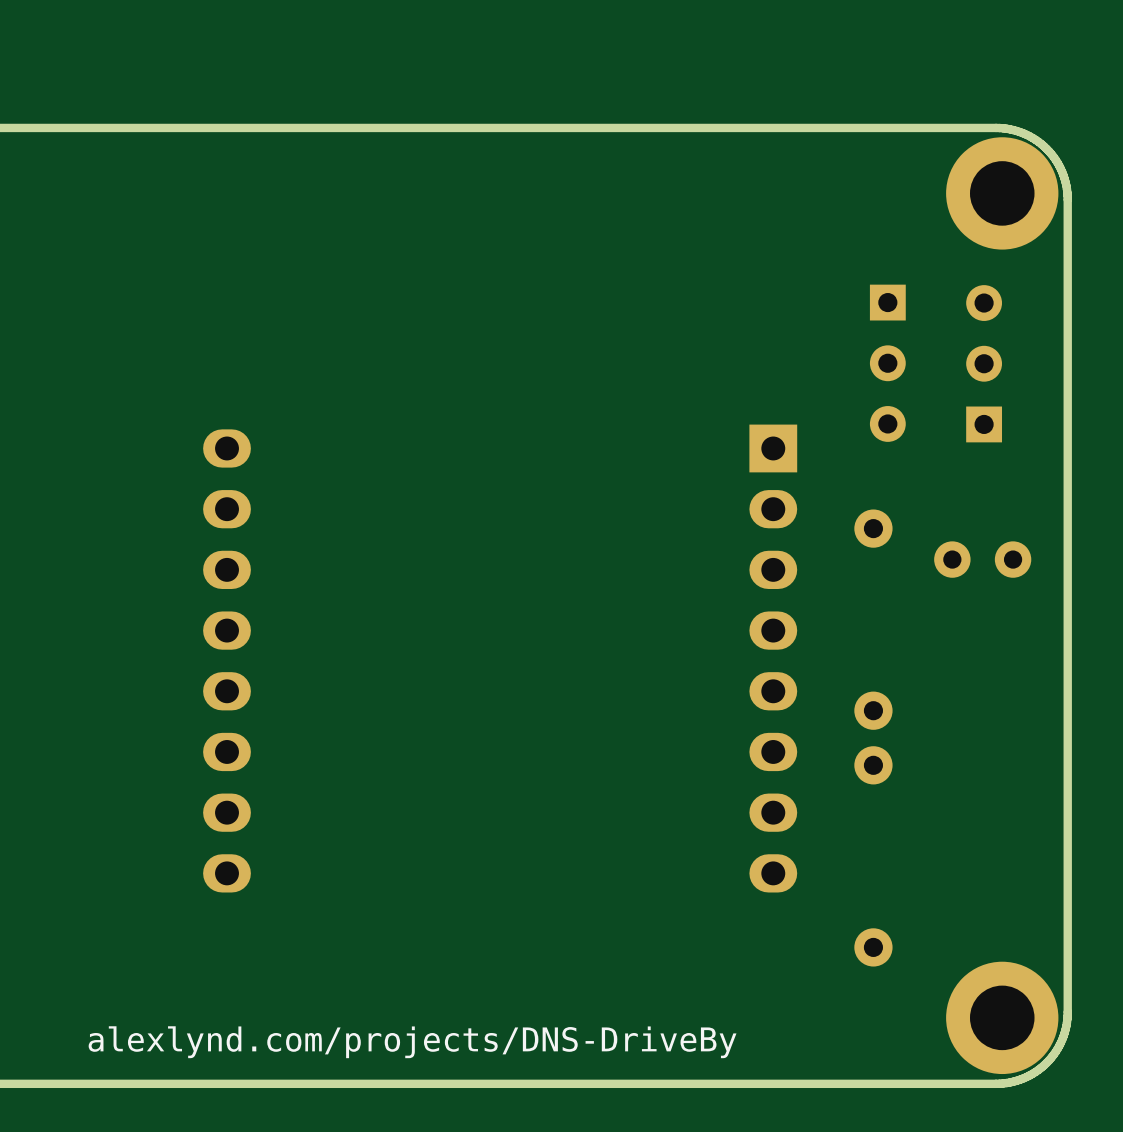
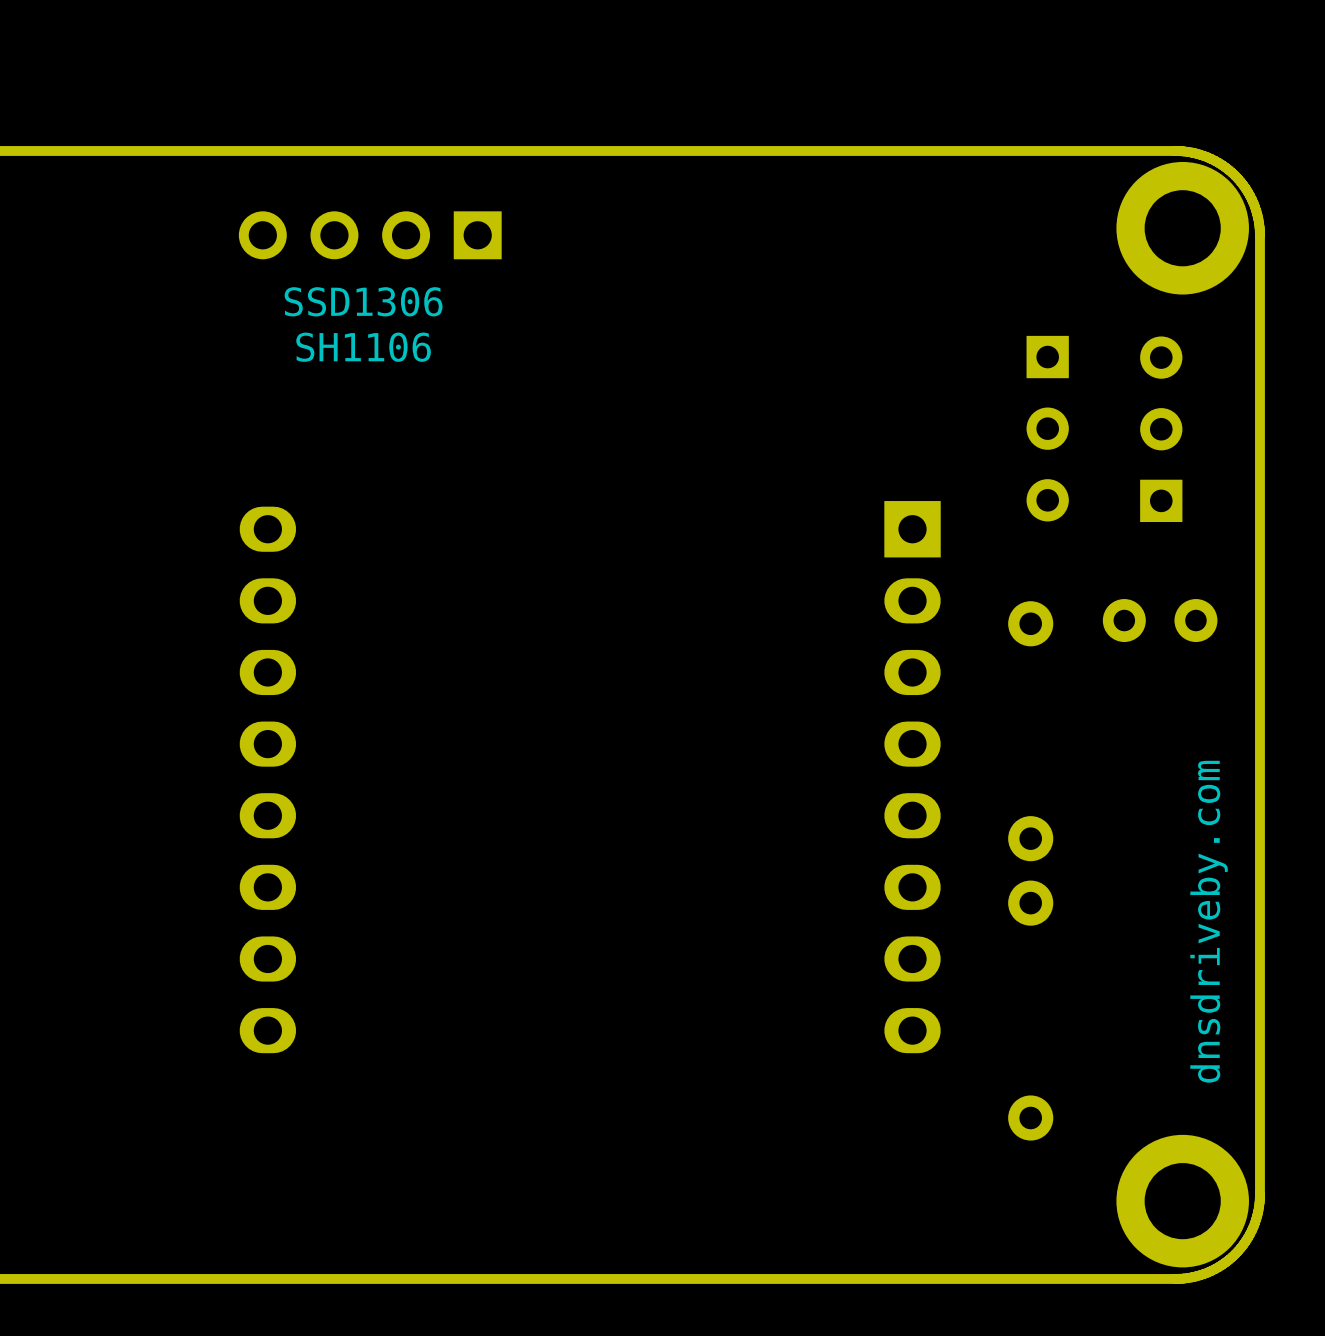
part: none -> (370, 235)
text: none -> SSD1306 (363, 301)
text: none -> SH1106 (363, 347)
part position: (982, 559) -> (1160, 620)
text: none -> dnsdriveby.com (1209, 921)
text: alexlynd.com/projects/DNS-DriveBy (412, 1042) -> none

